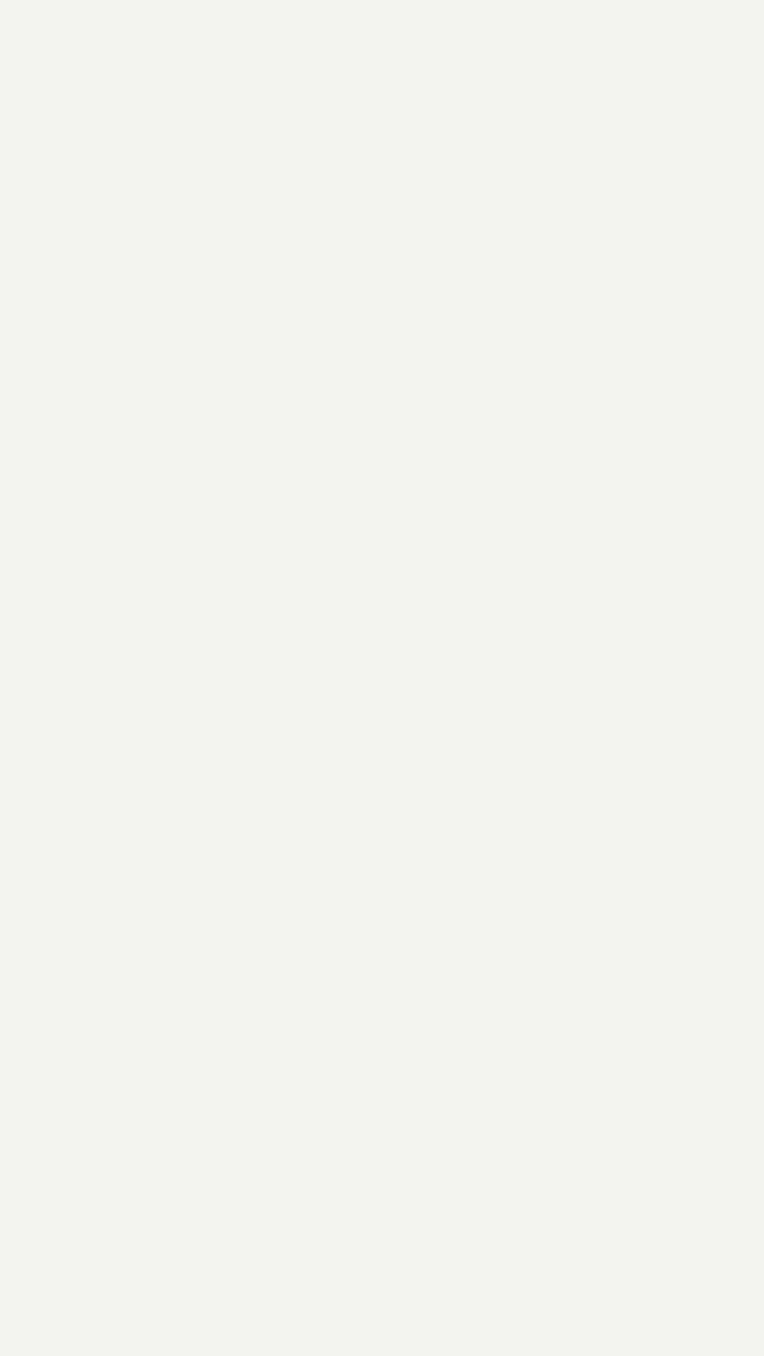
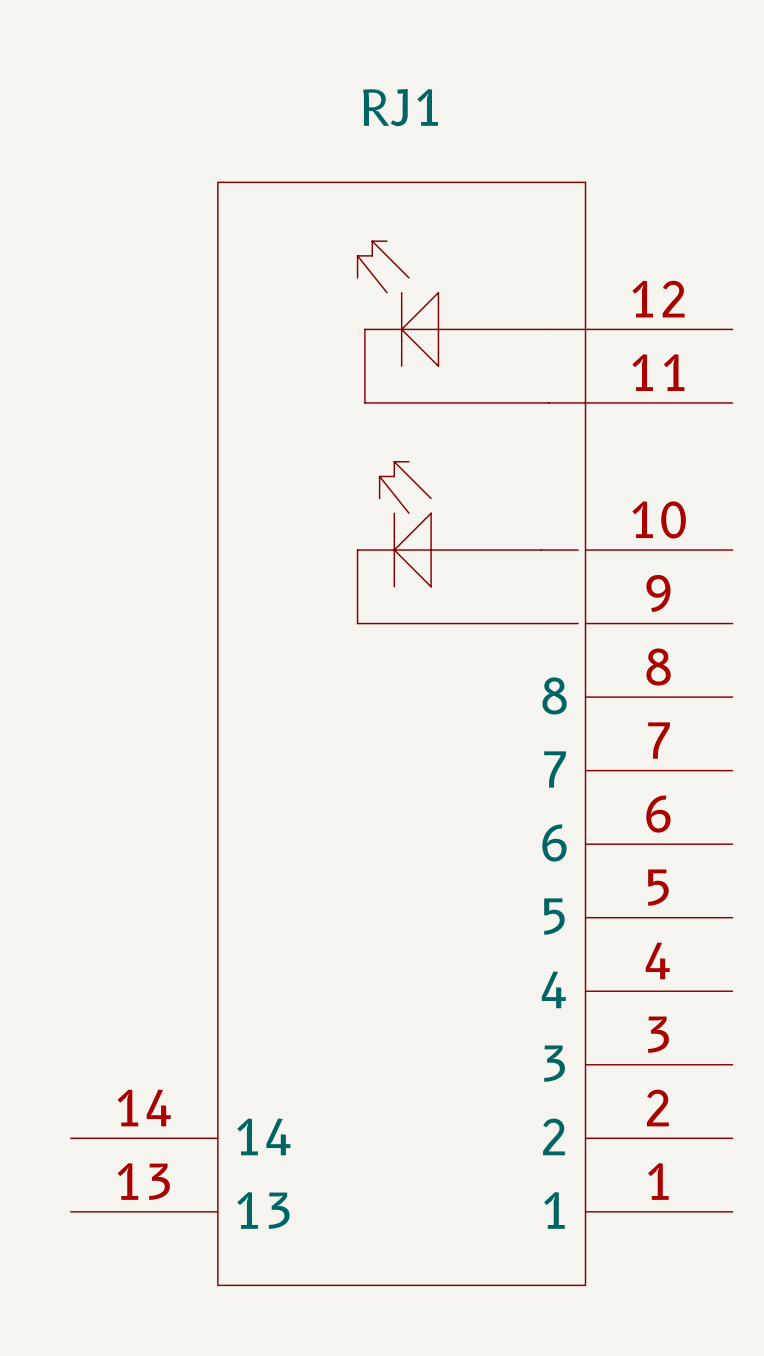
RJ1: none -> (401, 733)

